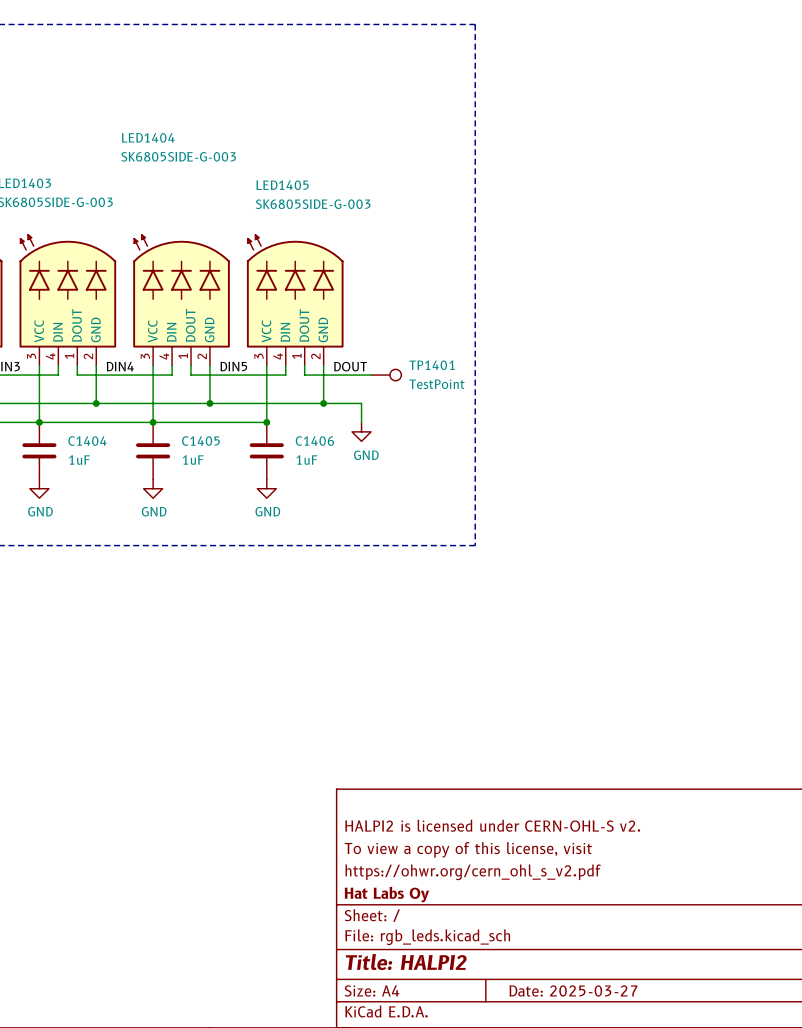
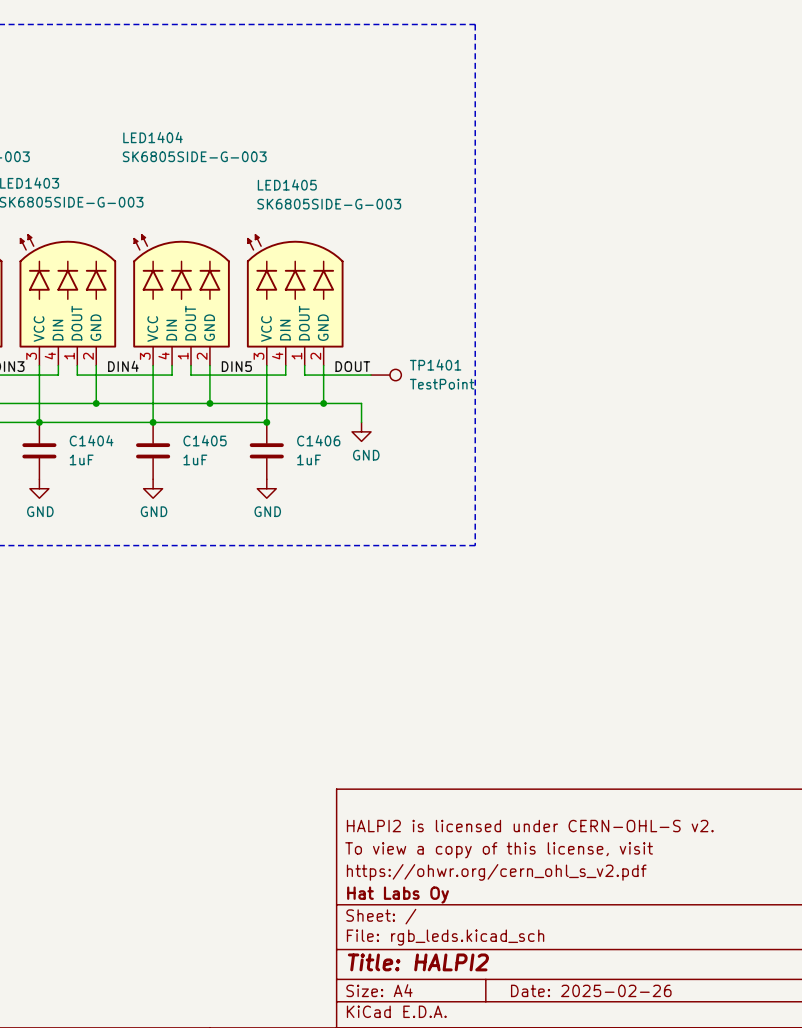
title block: Date: 2025-03-27 (573, 990) -> Date: 2025-02-26 (591, 990)

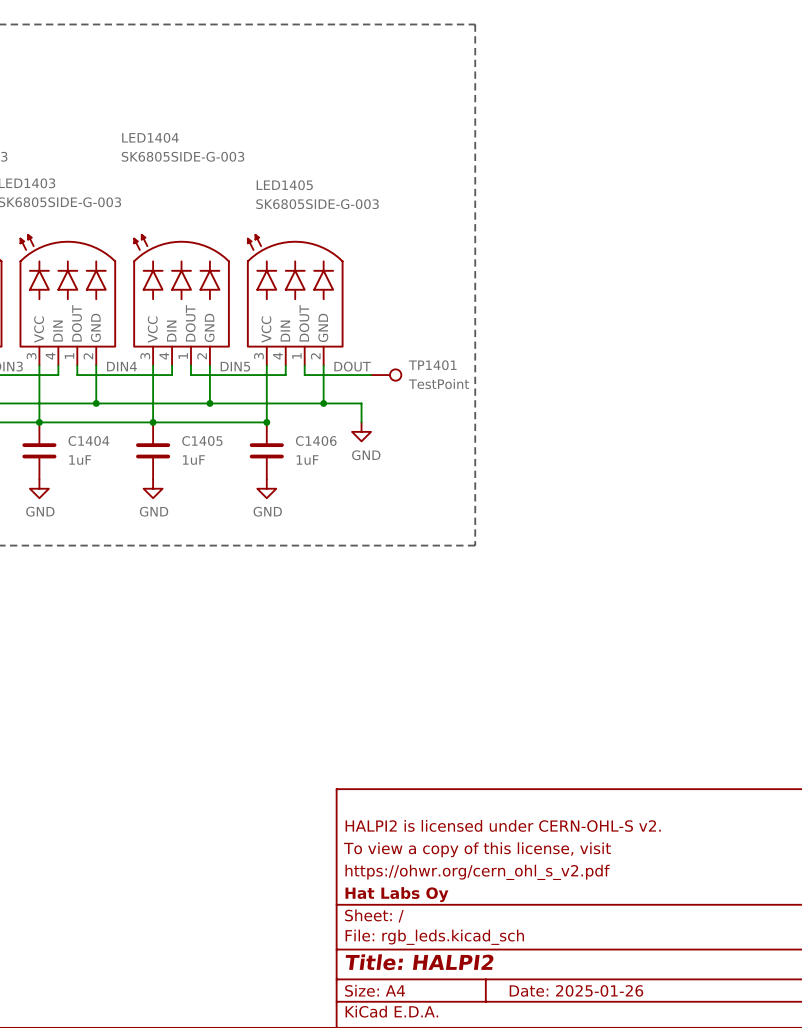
title block: Date: 2025-02-26 (591, 990) -> Date: 2025-01-26 (576, 990)

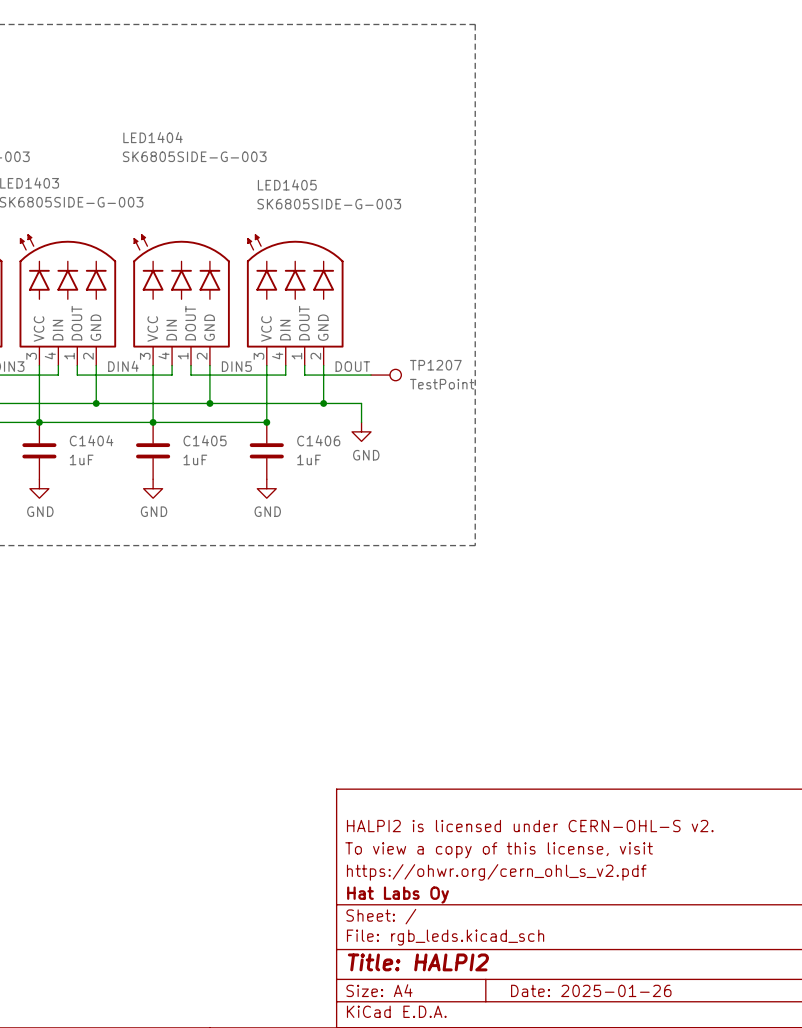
TP1401 name: TP1401 (432, 365) -> TP1207 (435, 365)

